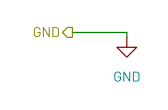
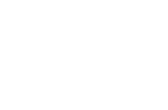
hierarchical label: GND (46, 32) -> none
wire: (72, 32) (126, 32) (126, 37) -> none
power symbol: GND (126, 47) -> none

